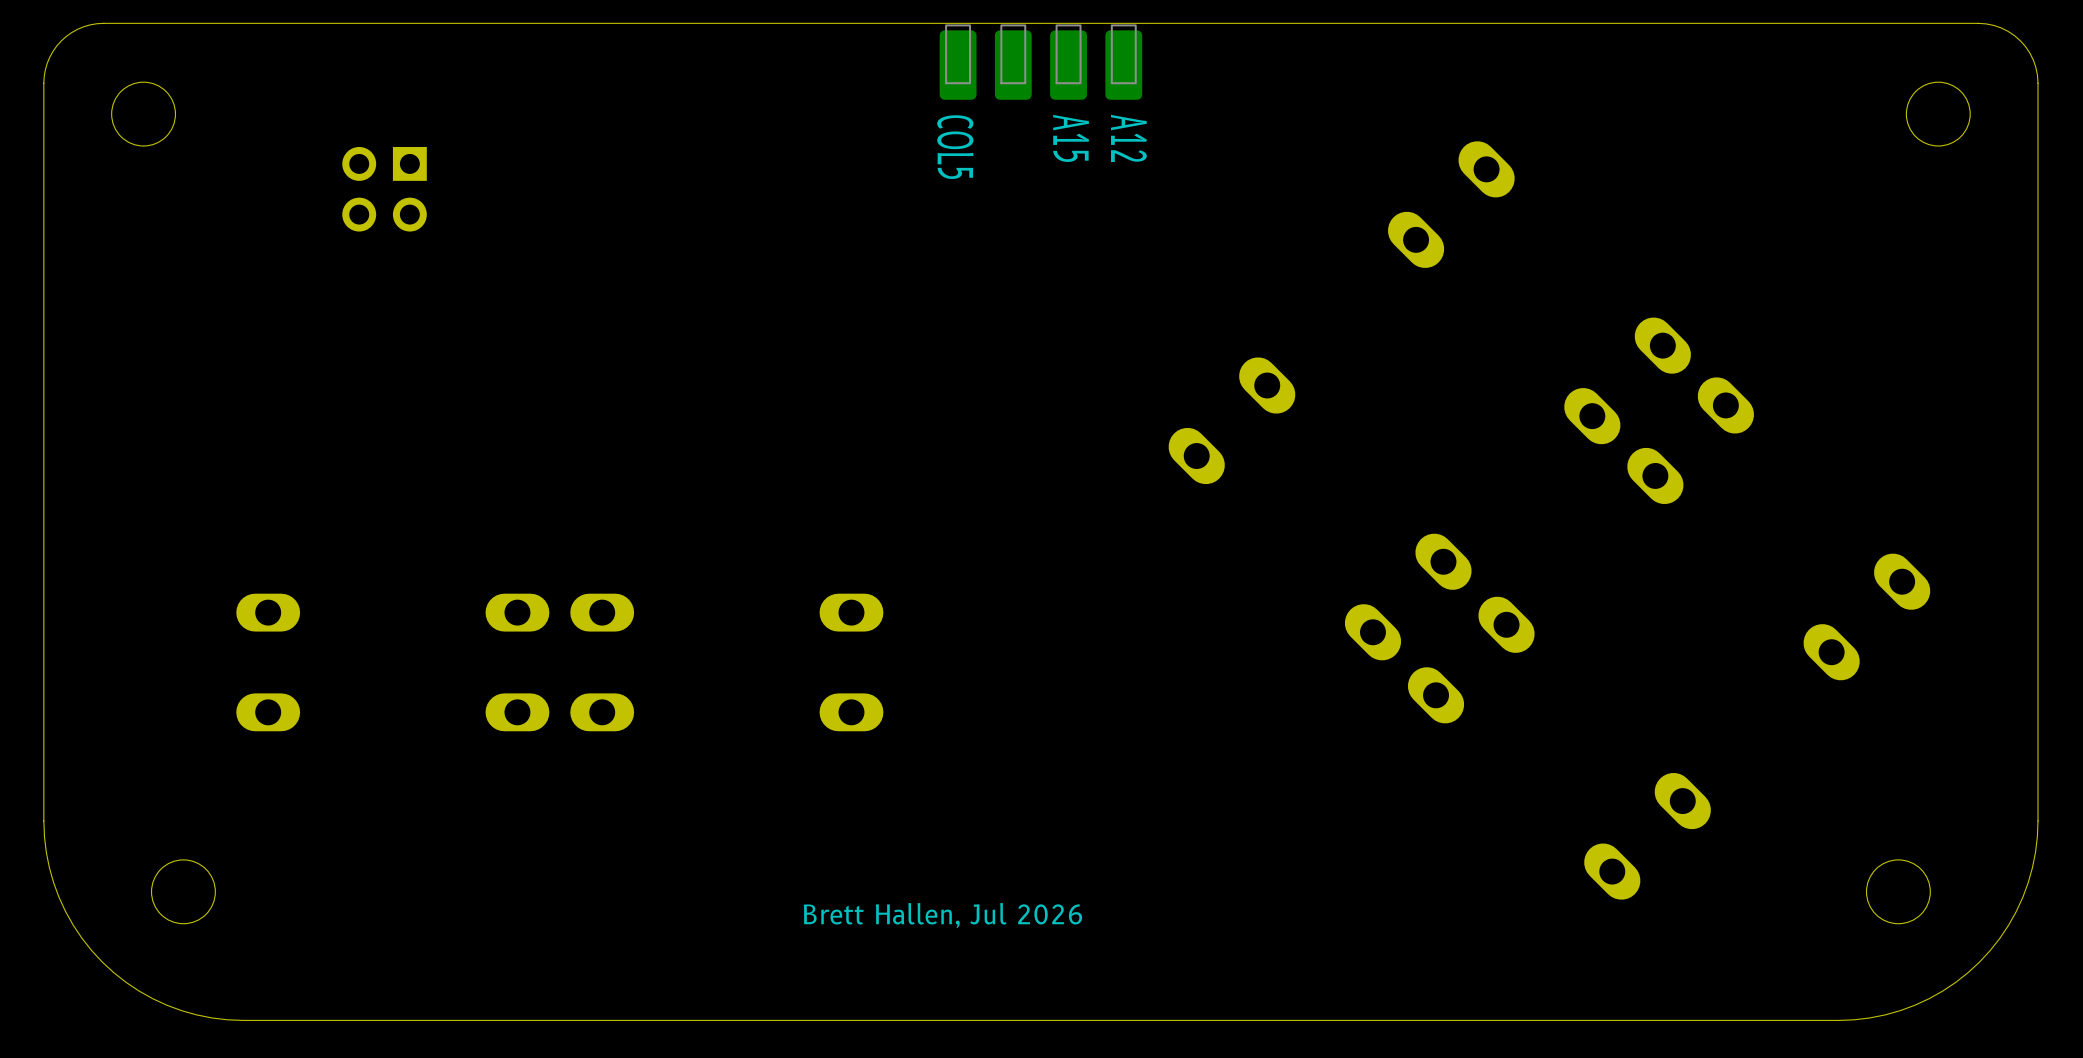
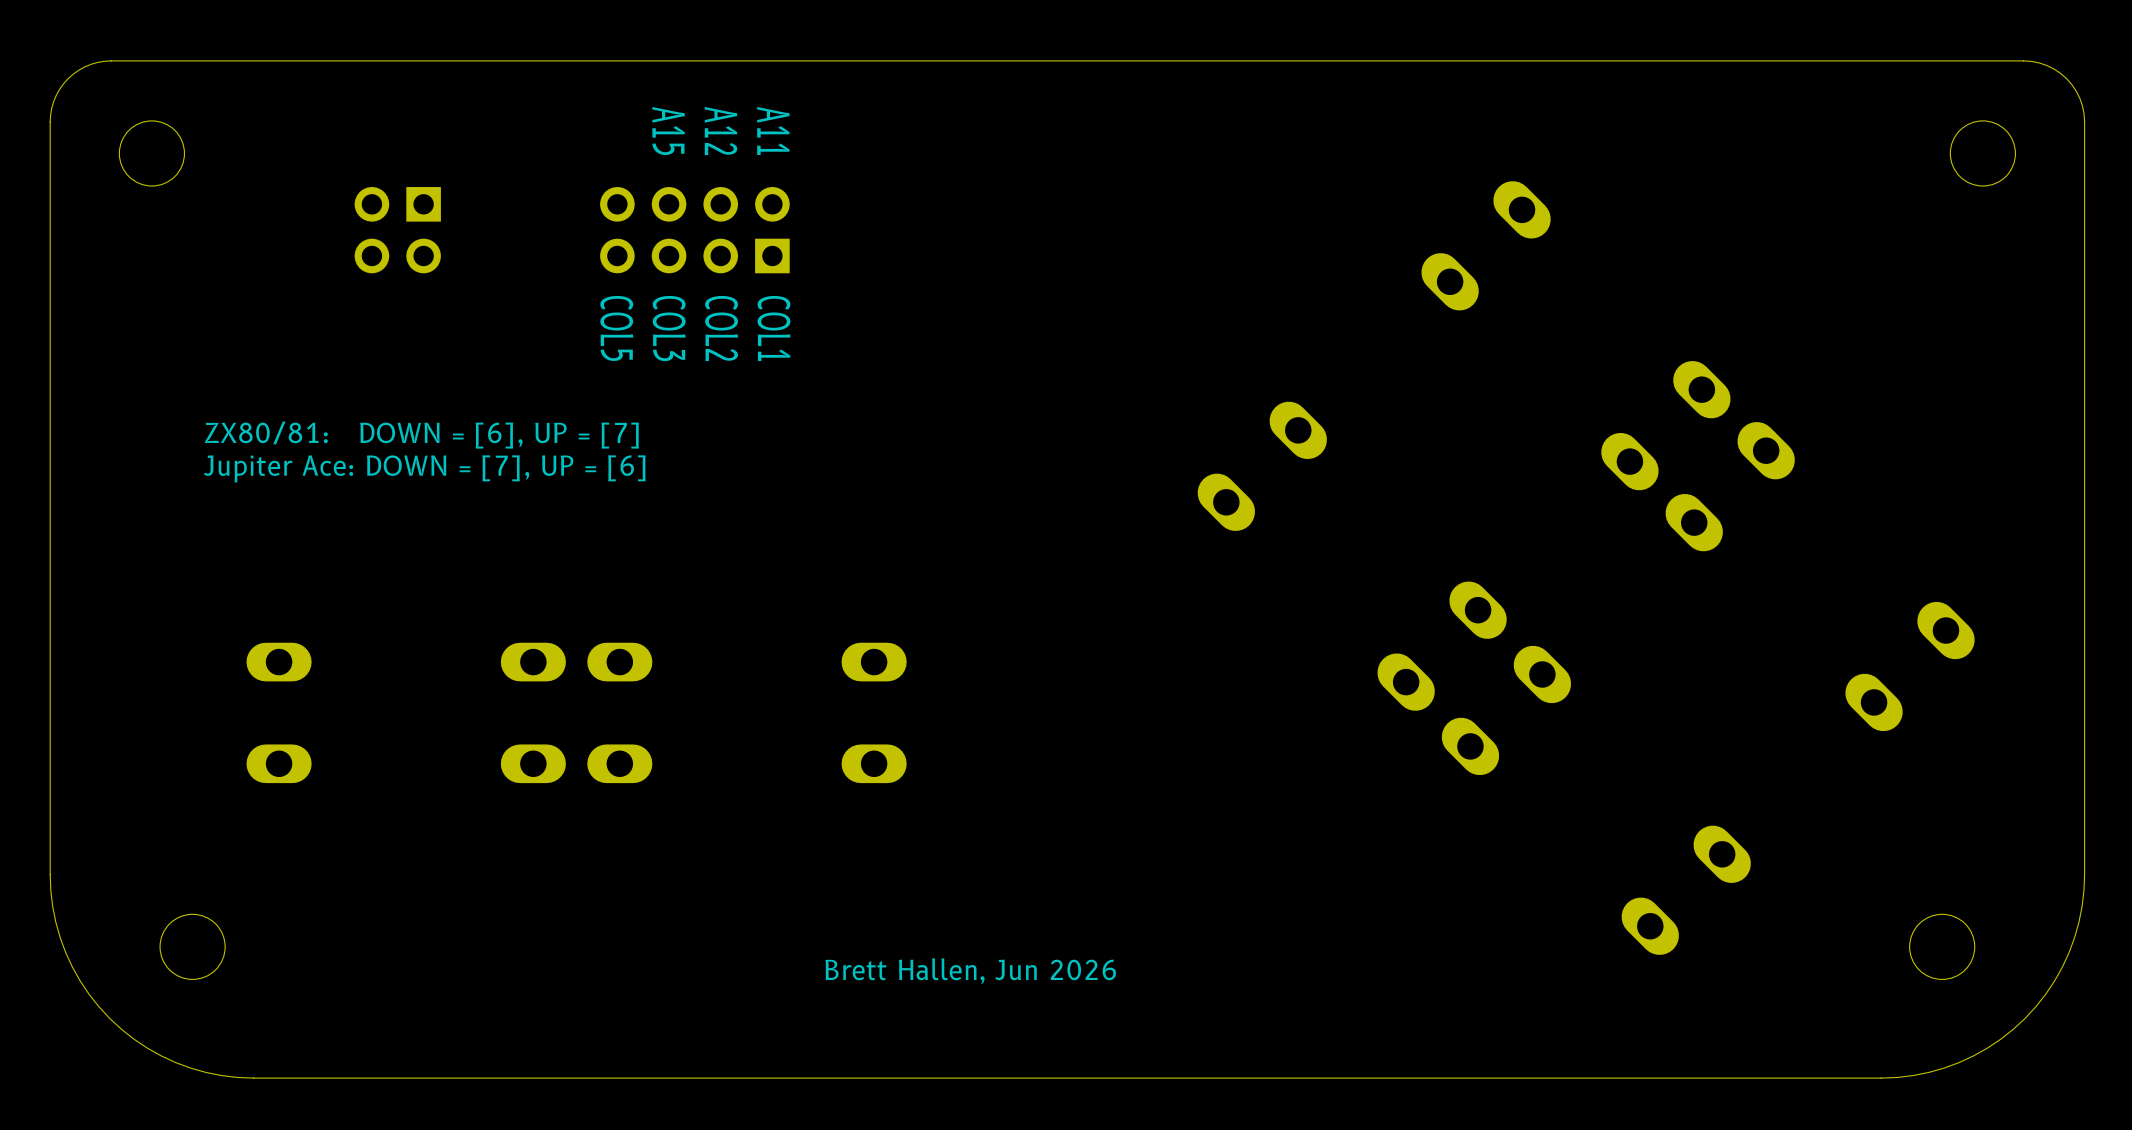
part: (1040, 62) -> none
text: none -> A11 (773, 130)
text position: A15 (1071, 138) -> A15 (668, 130)
text position: A12 (1128, 138) -> A12 (721, 131)
text position: COL5 (955, 147) -> COL5 (616, 328)
part: none -> (694, 230)
text: none -> COL3 (669, 328)
text: none -> COL2 (721, 328)
text: none -> COL1 (774, 328)
text: none -> ZX80/81: DOWN = [6], UP = [7] (421, 435)
text: none -> Jupiter Ace: DOWN = [7], UP = [6] (424, 468)
text: Brett Hallen, Jul 2026 (942, 915) -> Brett Hallen, Jun 2026 (970, 971)

